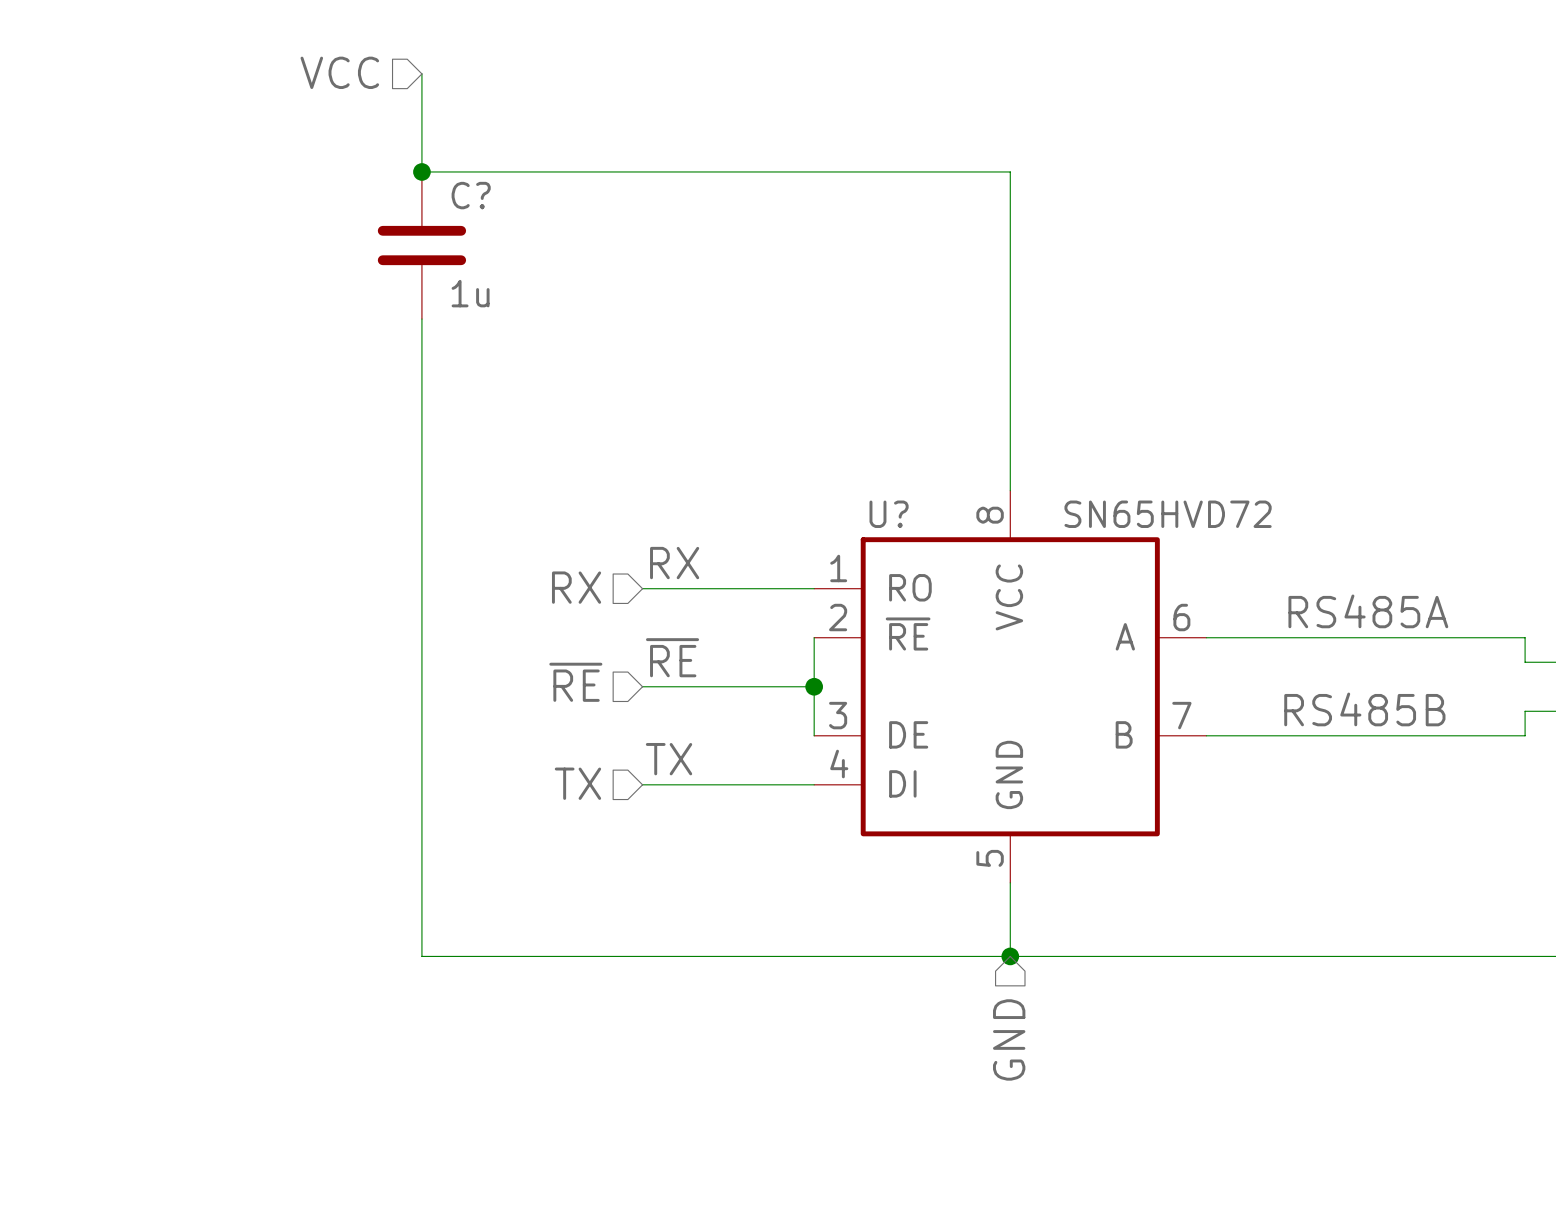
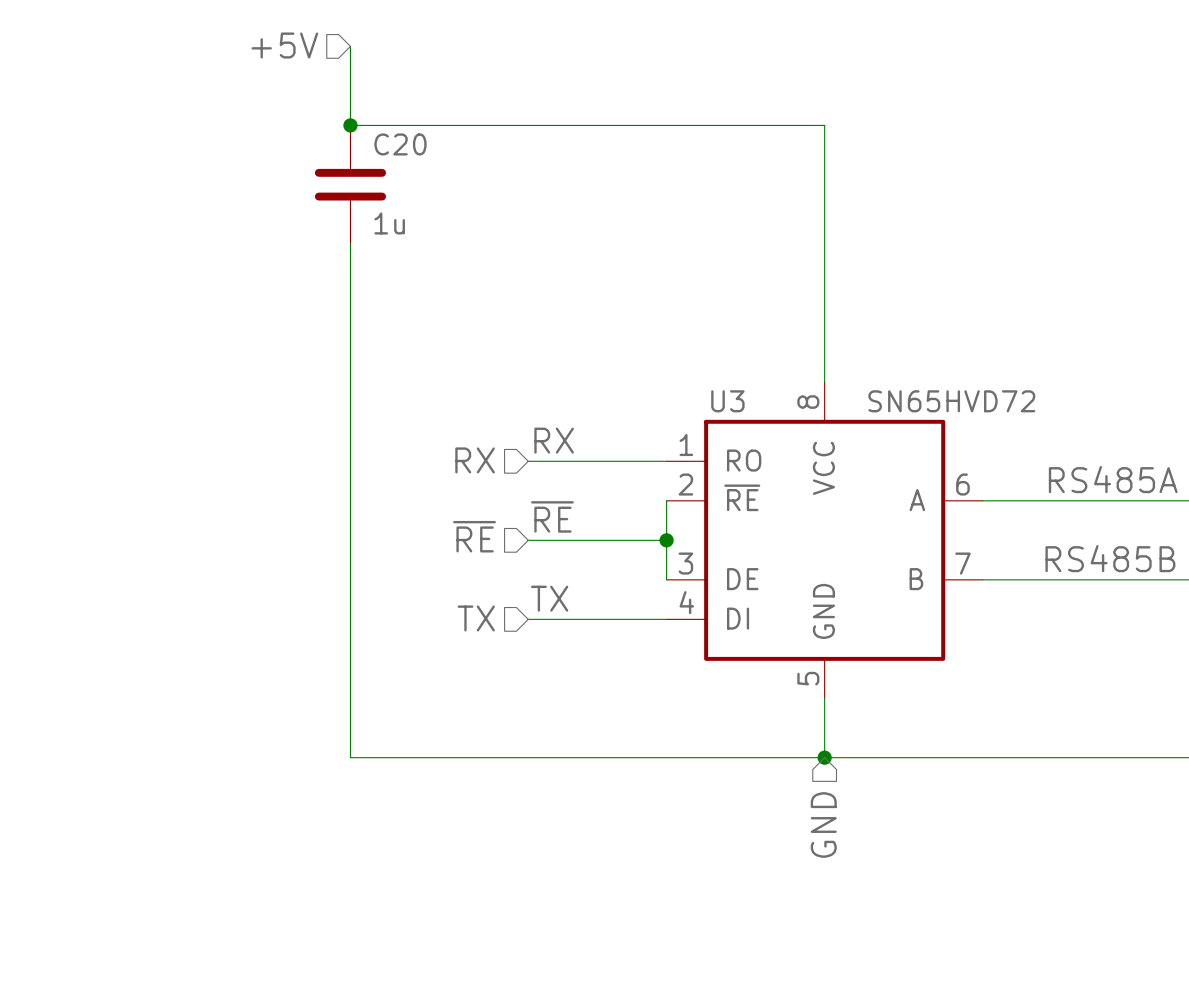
hierarchical label: VCC (339, 72) -> +5V (284, 45)
C? name: C? (471, 195) -> C20 (400, 144)
U? name: U? (889, 514) -> U3 (727, 401)

